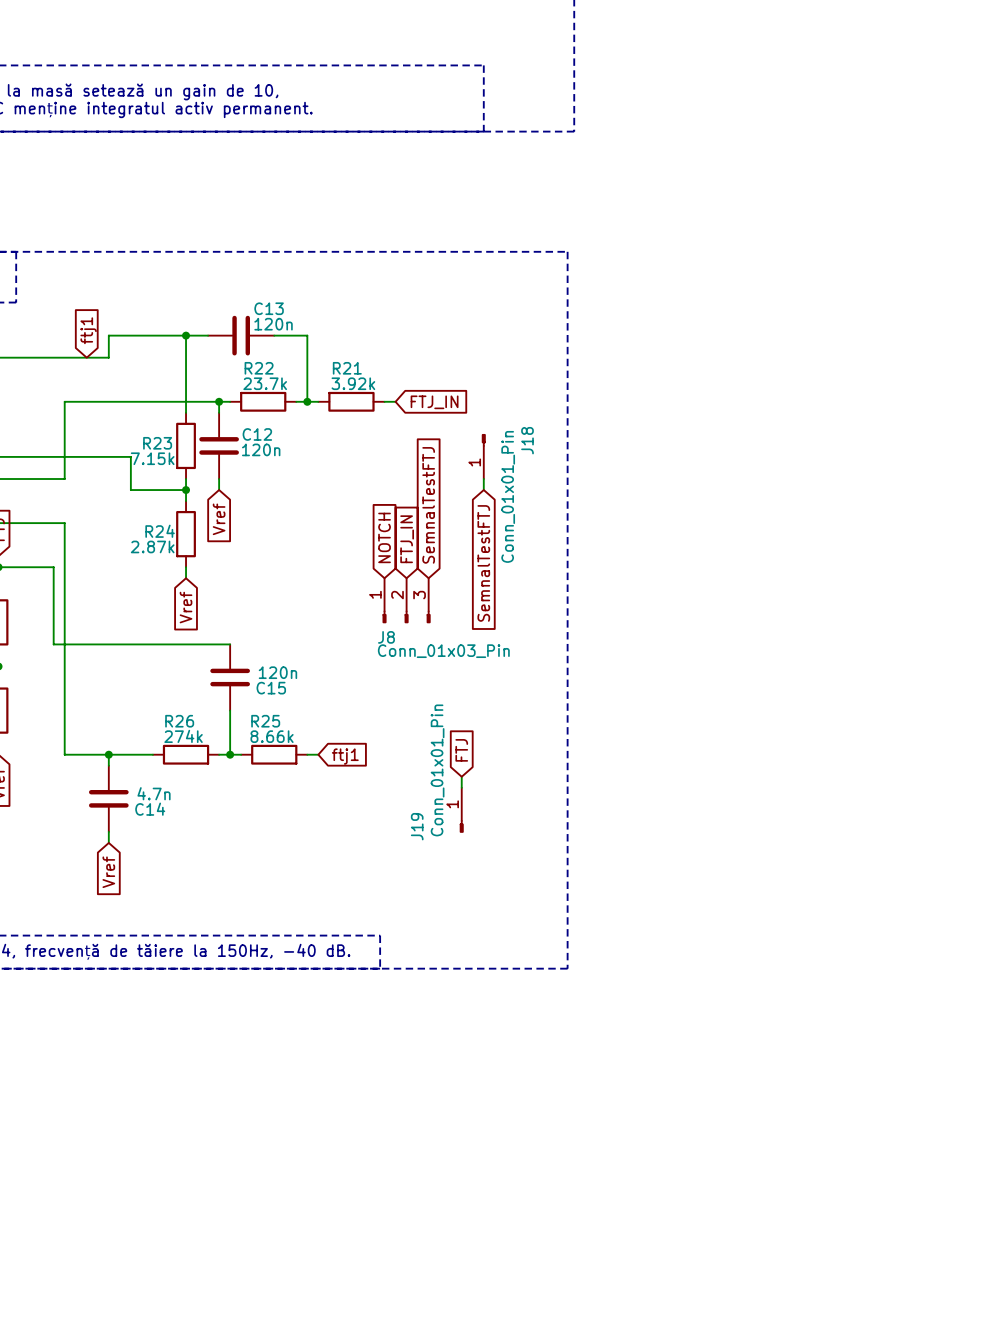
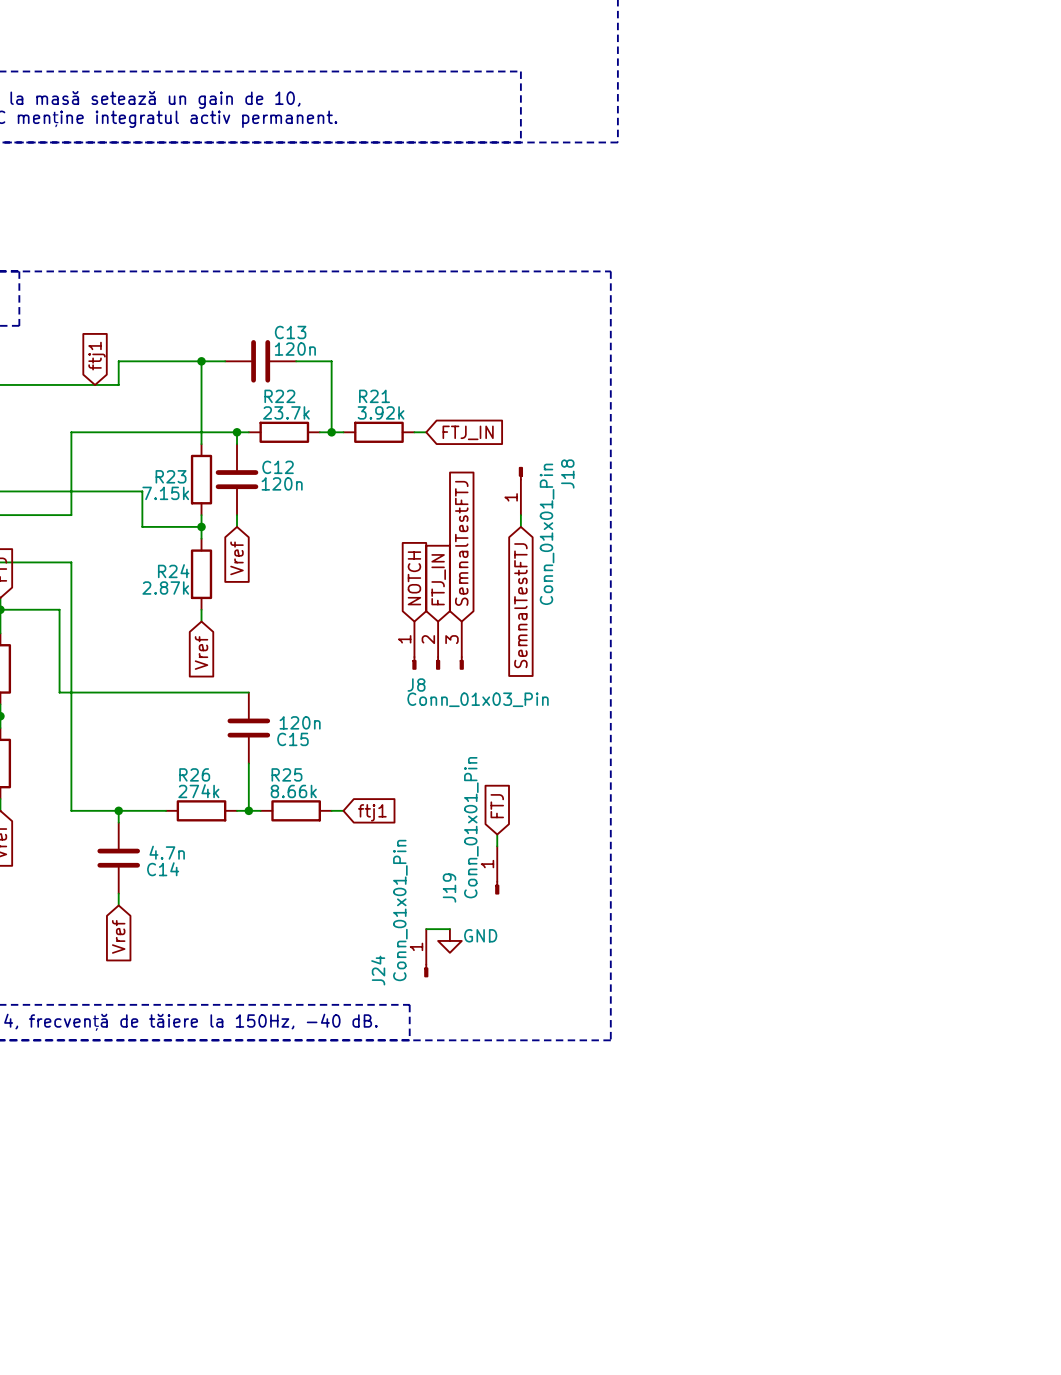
wire: none -> (426, 929) (449, 929)
power symbol: none -> GND (449, 940)
J24: none -> Conn_01x01_Pin (426, 953)

